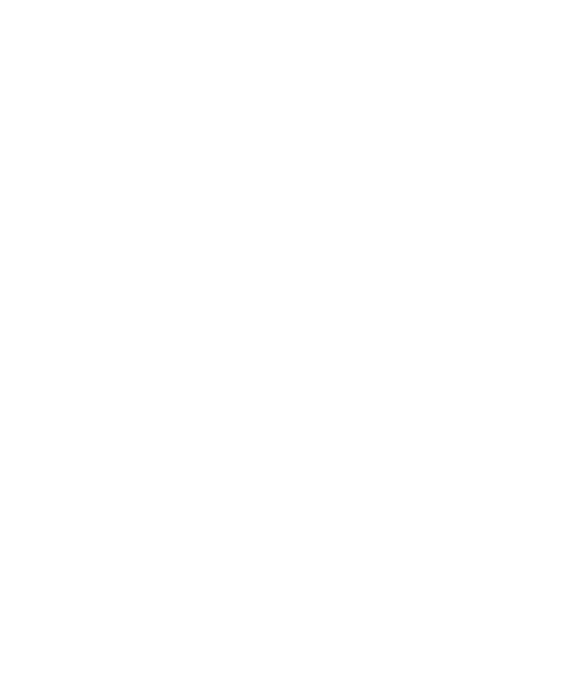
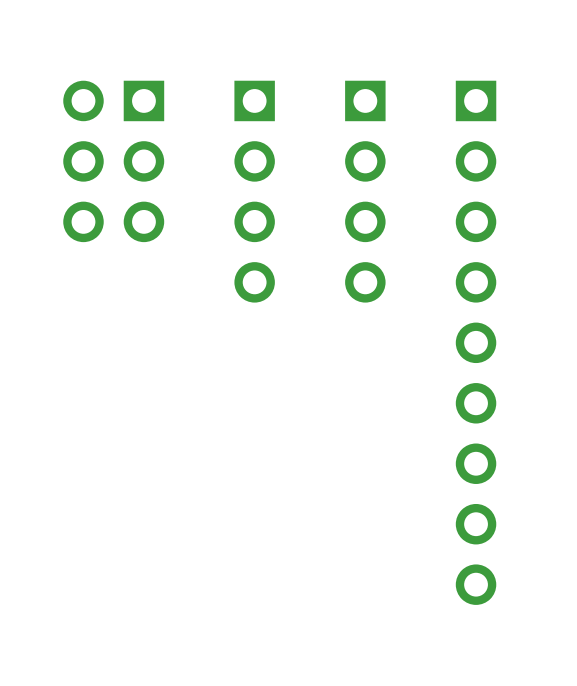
part: none -> (113, 161)
part: none -> (254, 191)
part: none -> (365, 191)
part: none -> (476, 342)

